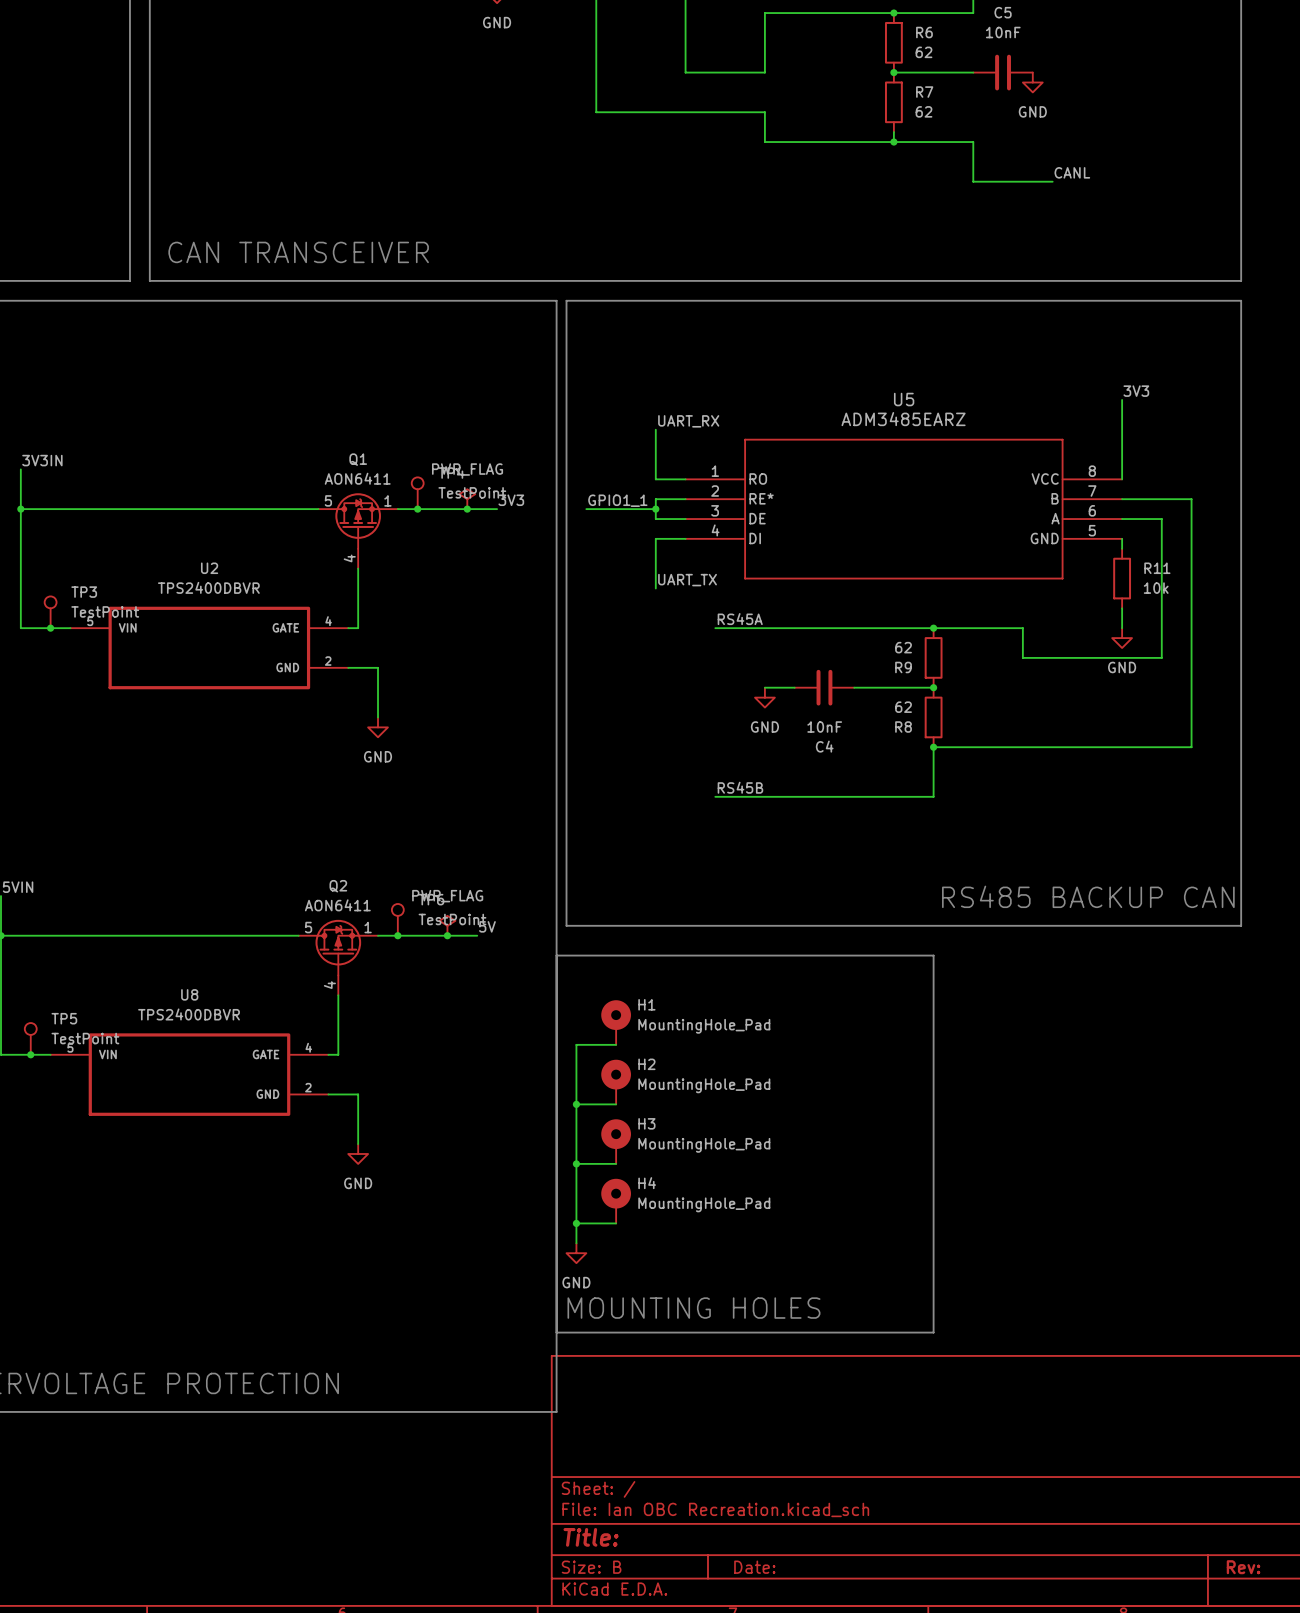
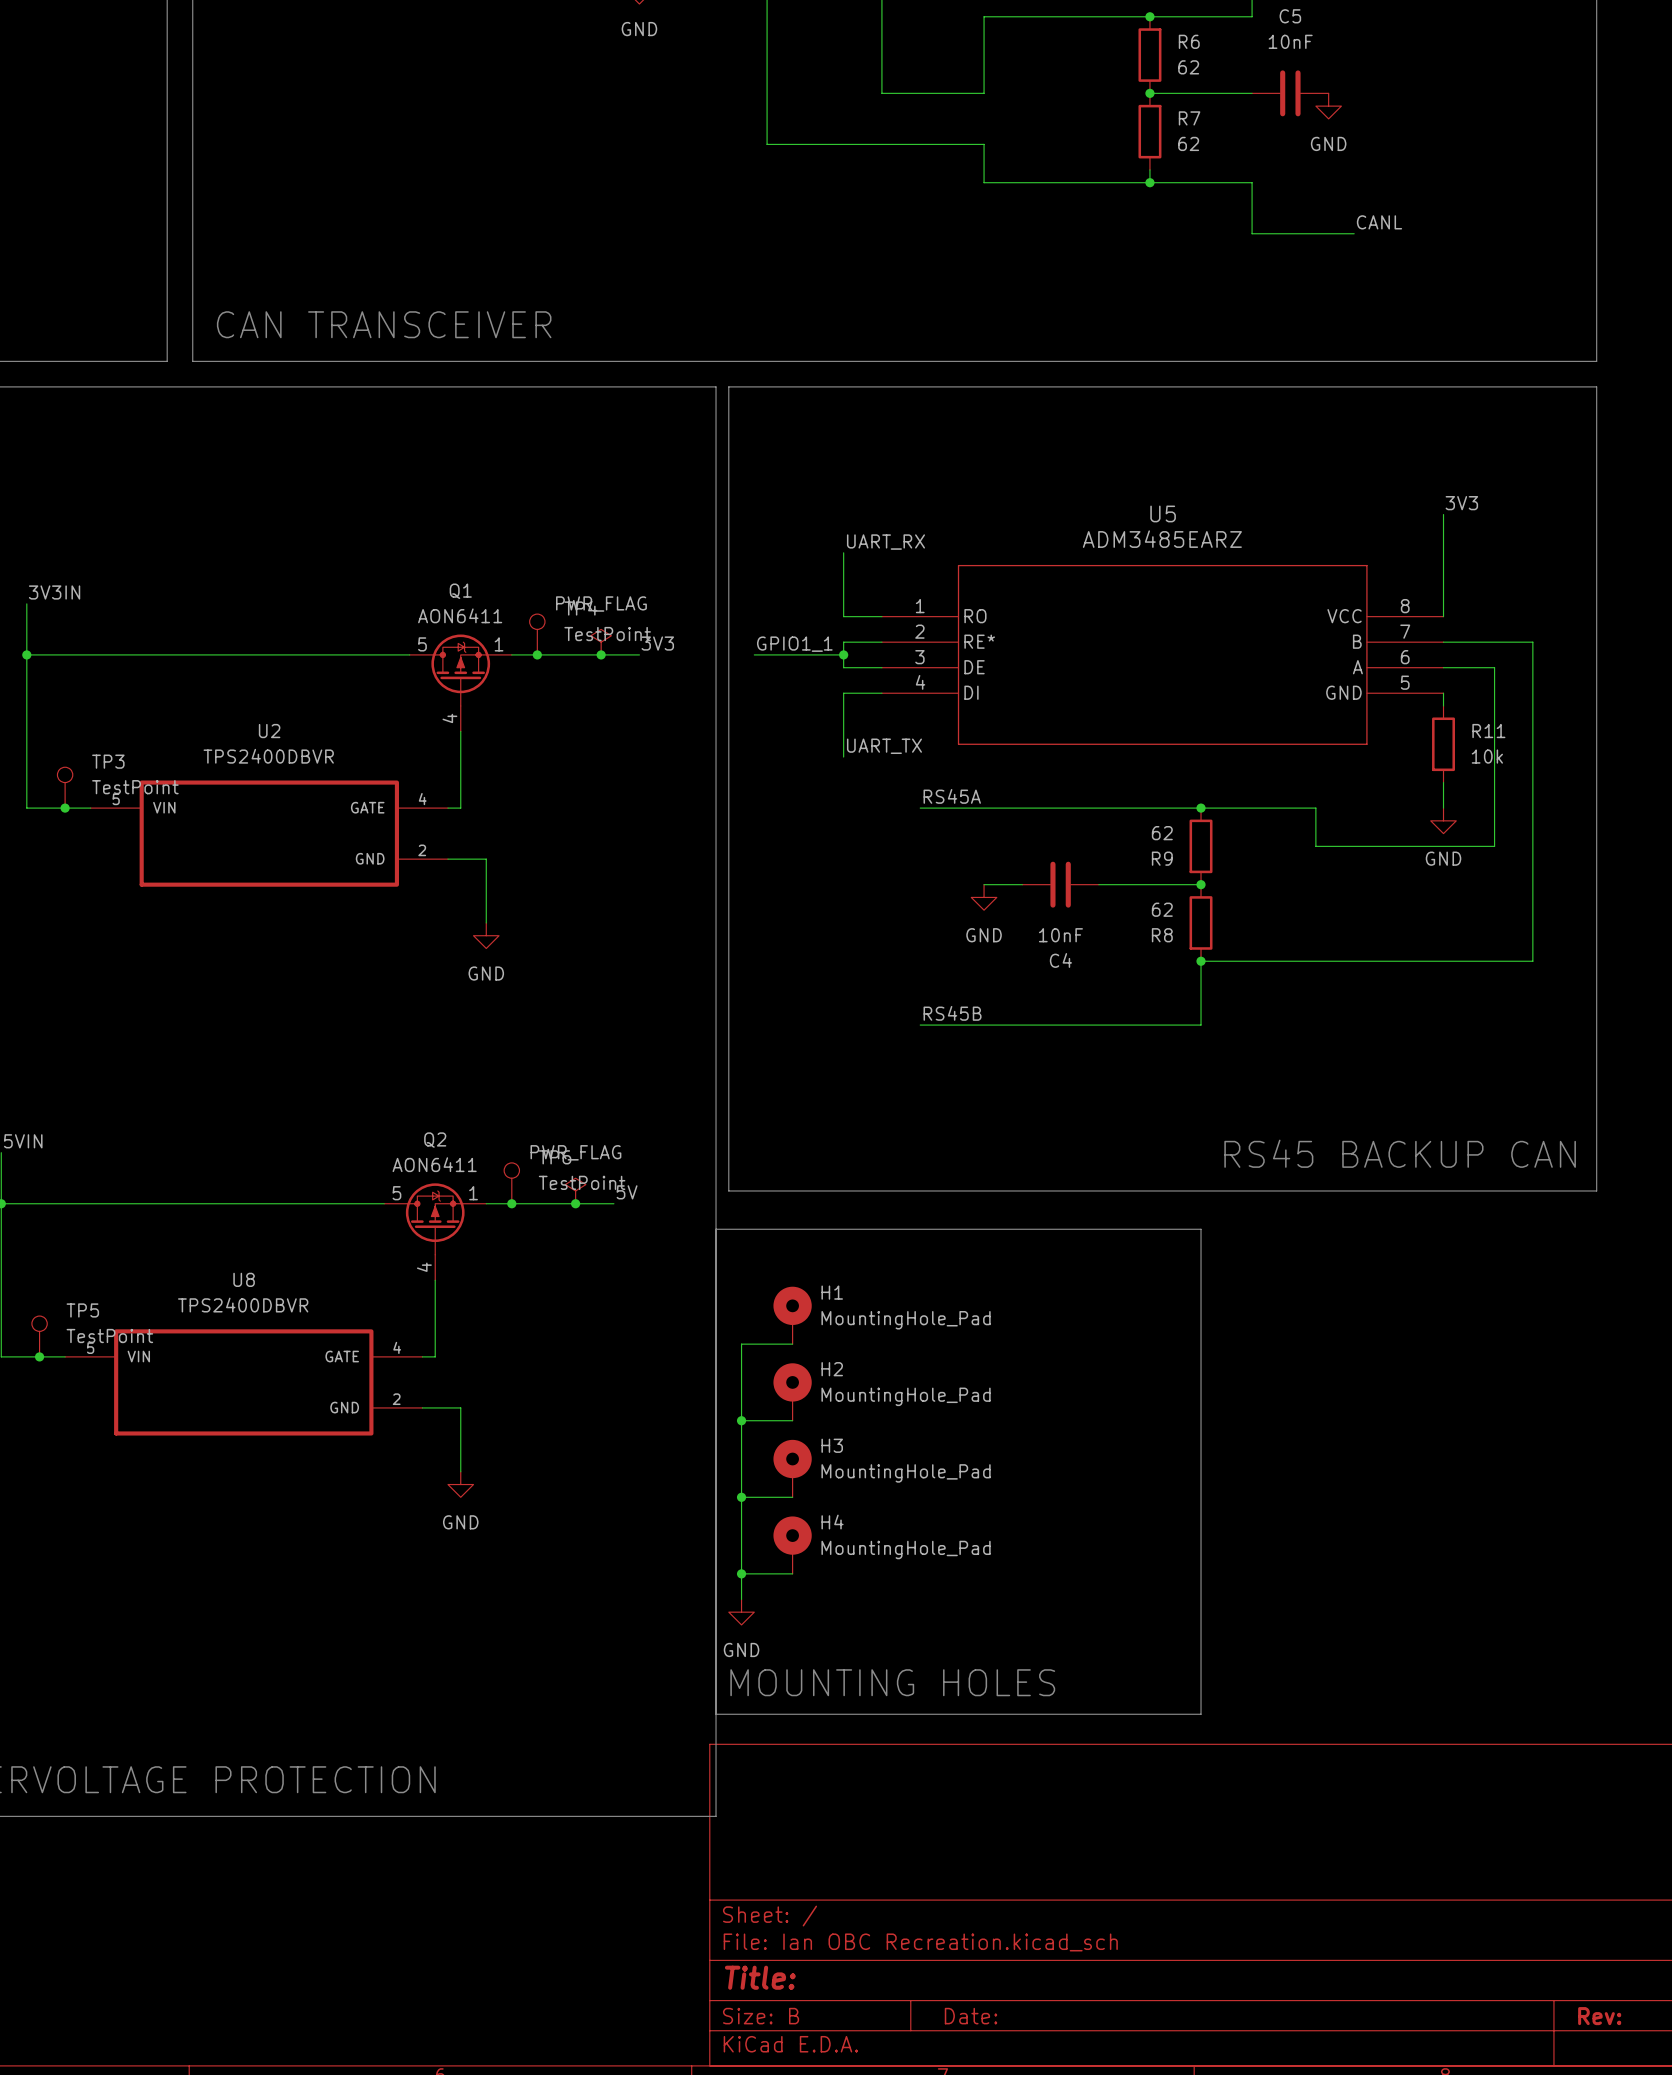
text: RS485 BACKUP CAN (1088, 896) -> RS45 BACKUP CAN (1400, 1153)

